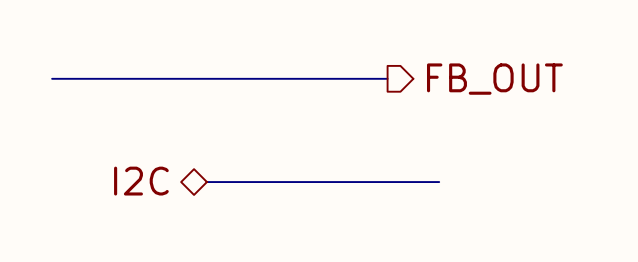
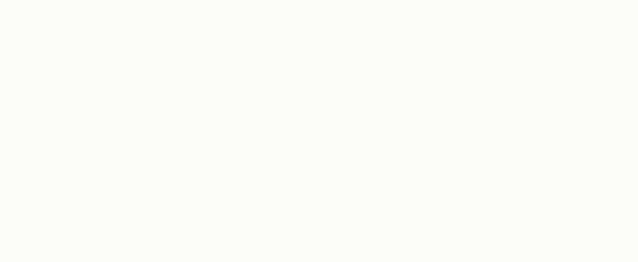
wire: (52, 78) (387, 78) -> none
hierarchical label: FB_OUT (494, 79) -> none
hierarchical label: I2C (141, 181) -> none
bus: (206, 182) (439, 182) -> none

